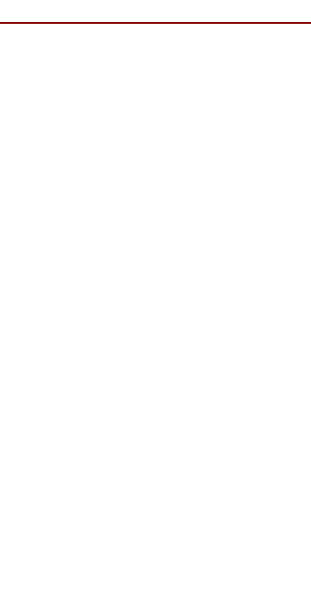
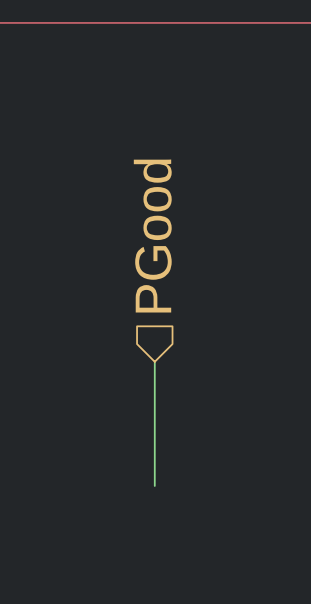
hierarchical label: none -> PGood (152, 236)
wire: none -> (154, 361) (154, 485)

